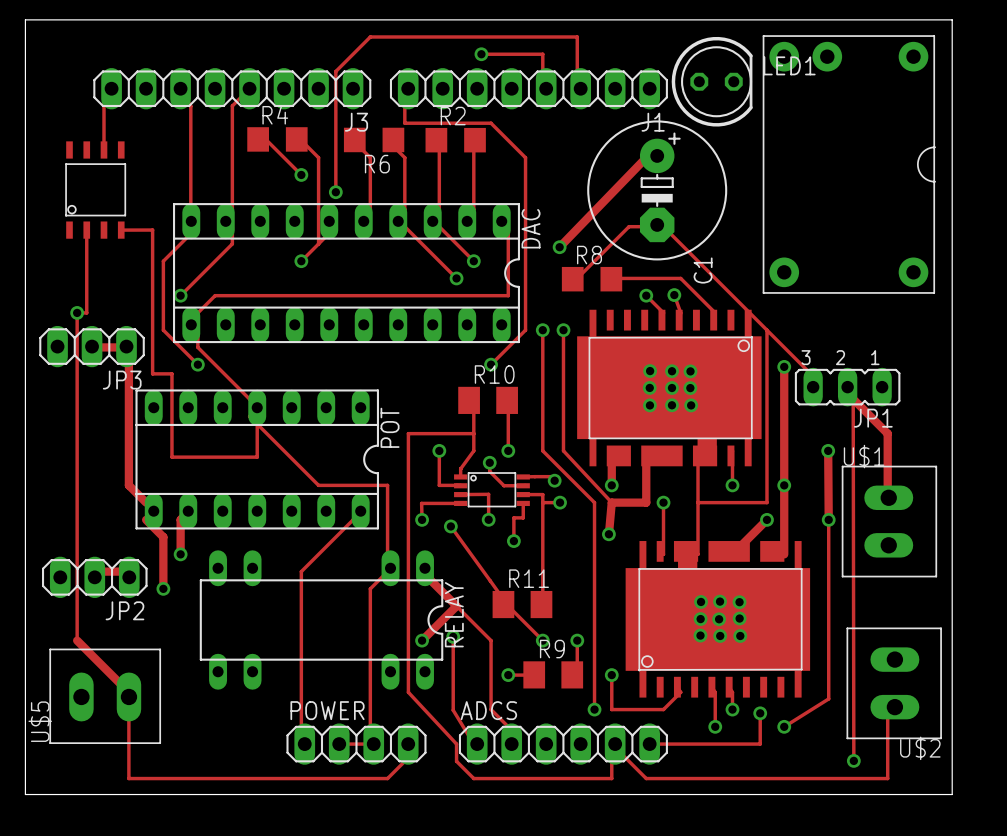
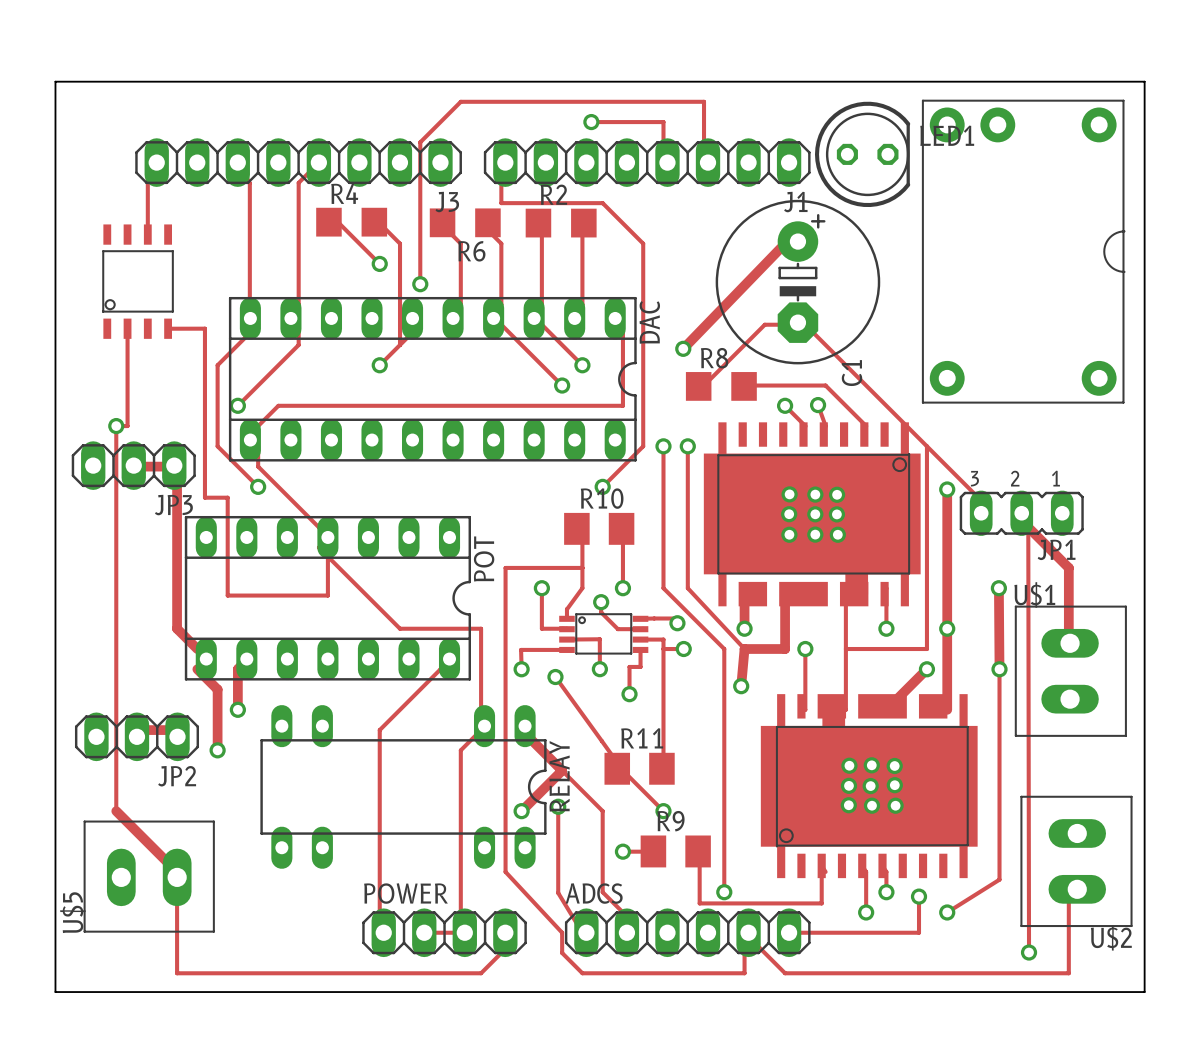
track: (577, 640) (577, 675) -> (821, 865) (821, 903) (699, 903) (699, 851) (704, 851)
via: (577, 640) -> none
track: (611, 675) (611, 709) (663, 709) (680, 692) -> none
via: (611, 675) -> none

